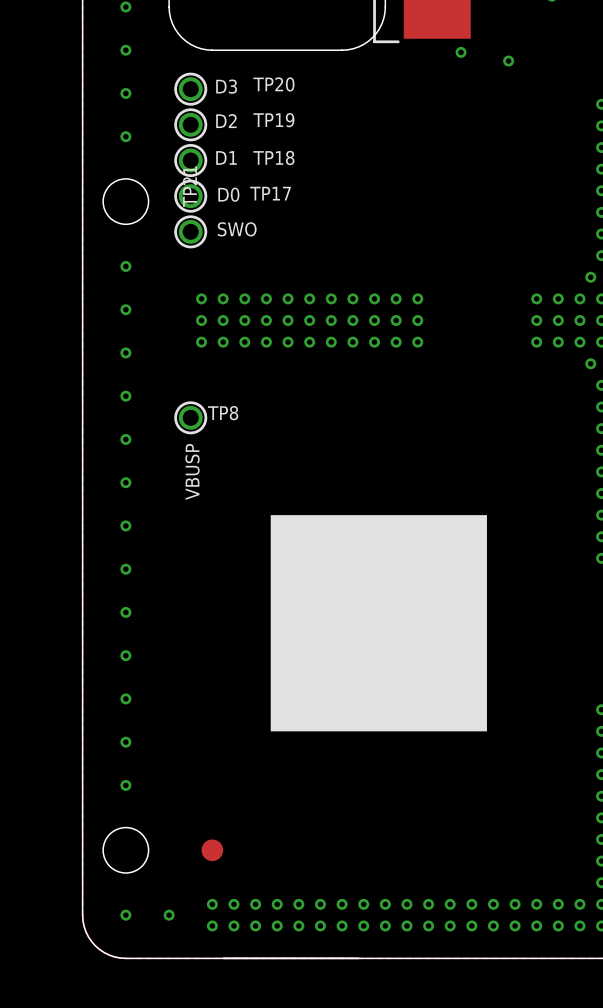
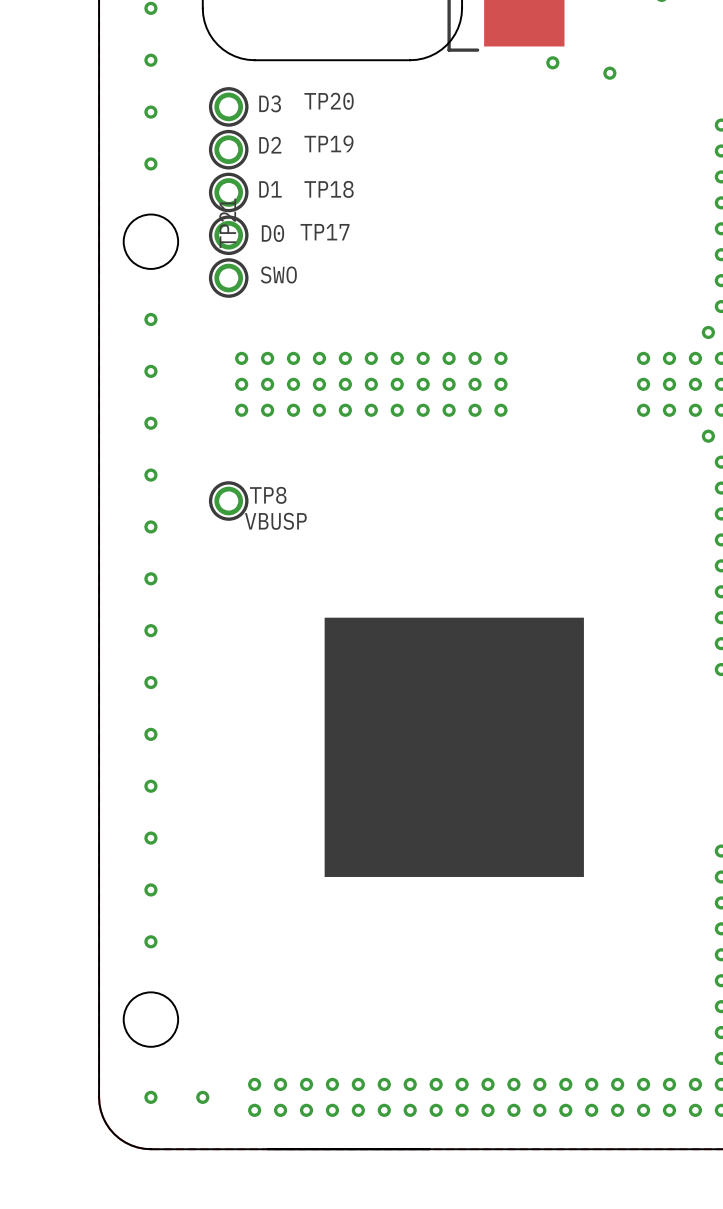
text rotation: 0° (192, 471) -> 90° clockwise (275, 521)
part: (212, 850) -> none

